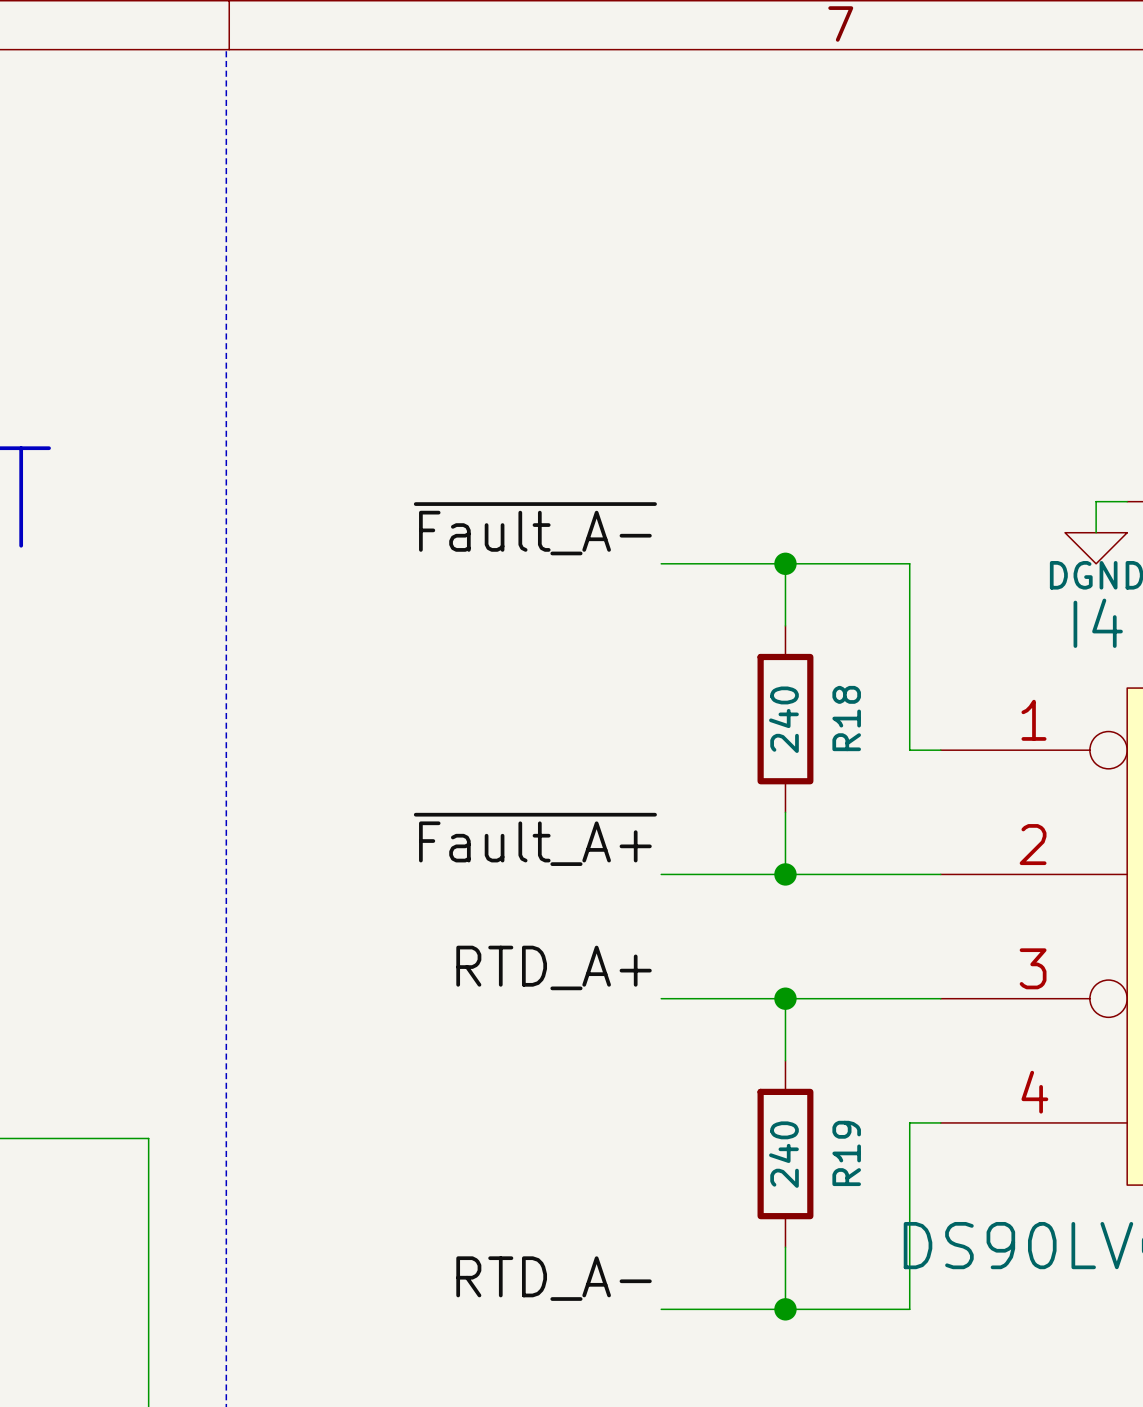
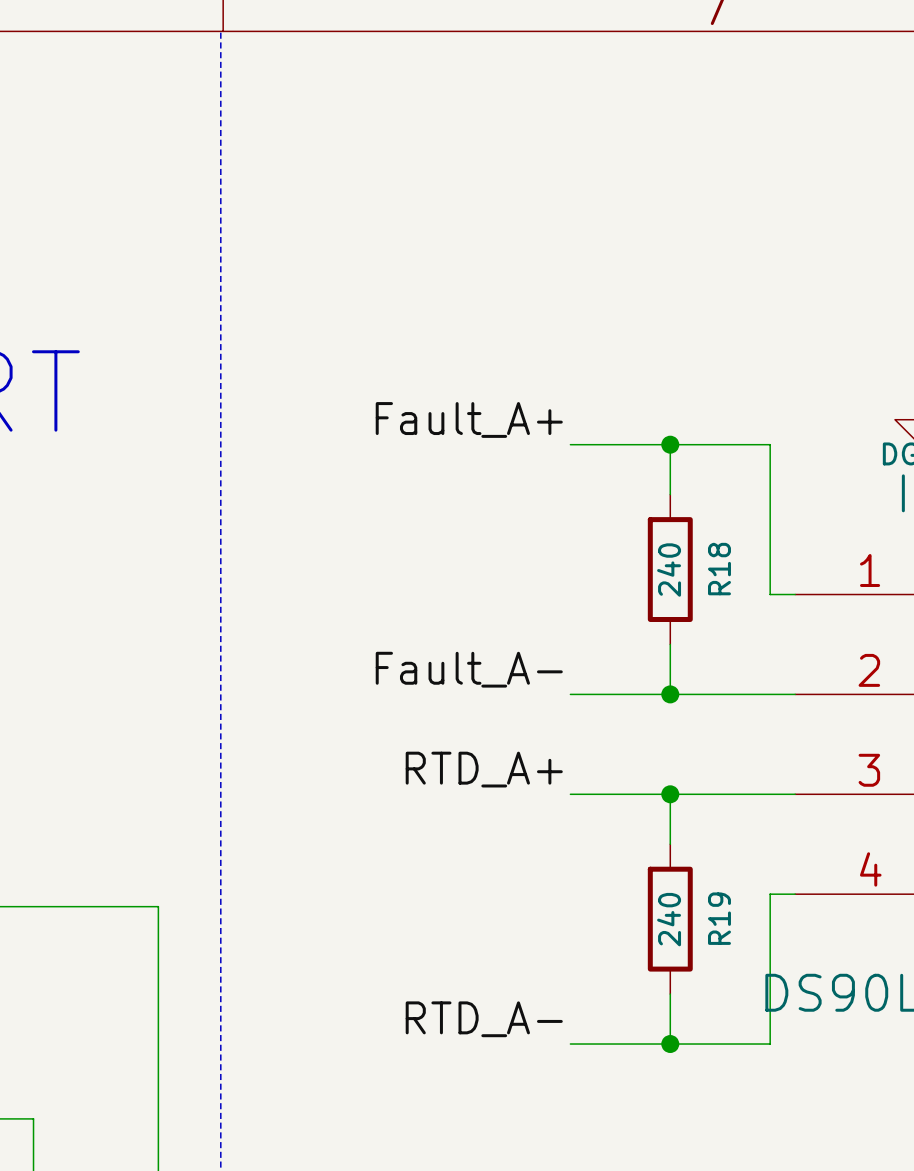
label: ~{Fault_A-} (535, 528) -> Fault_A+ (469, 419)
label: ~{Fault_A+} (535, 839) -> Fault_A- (469, 669)

